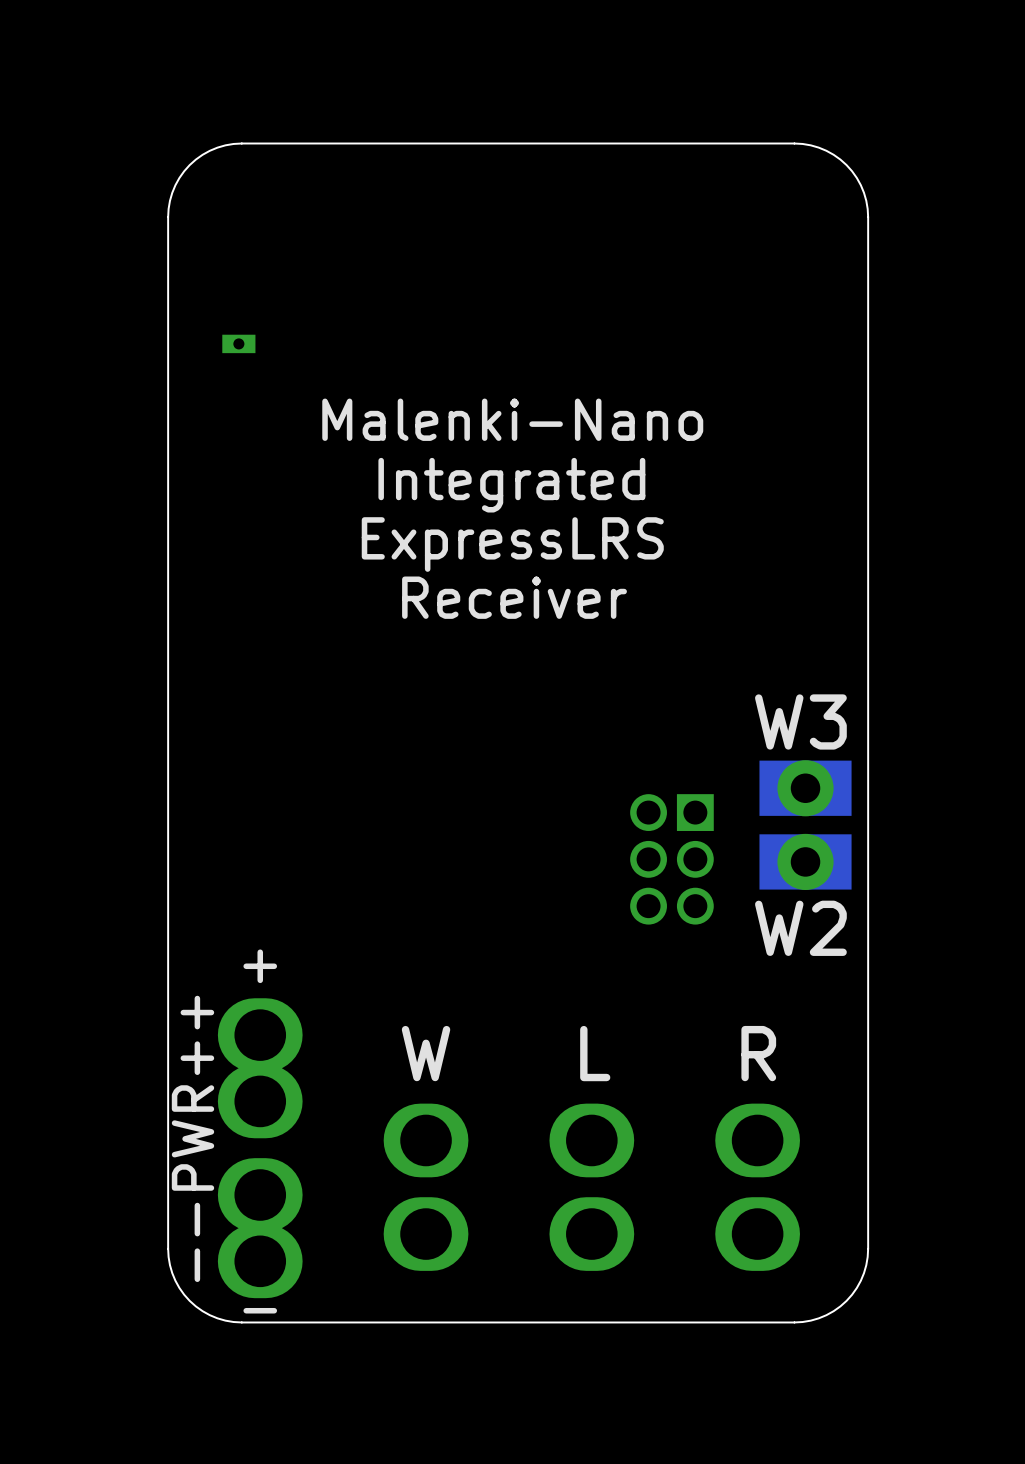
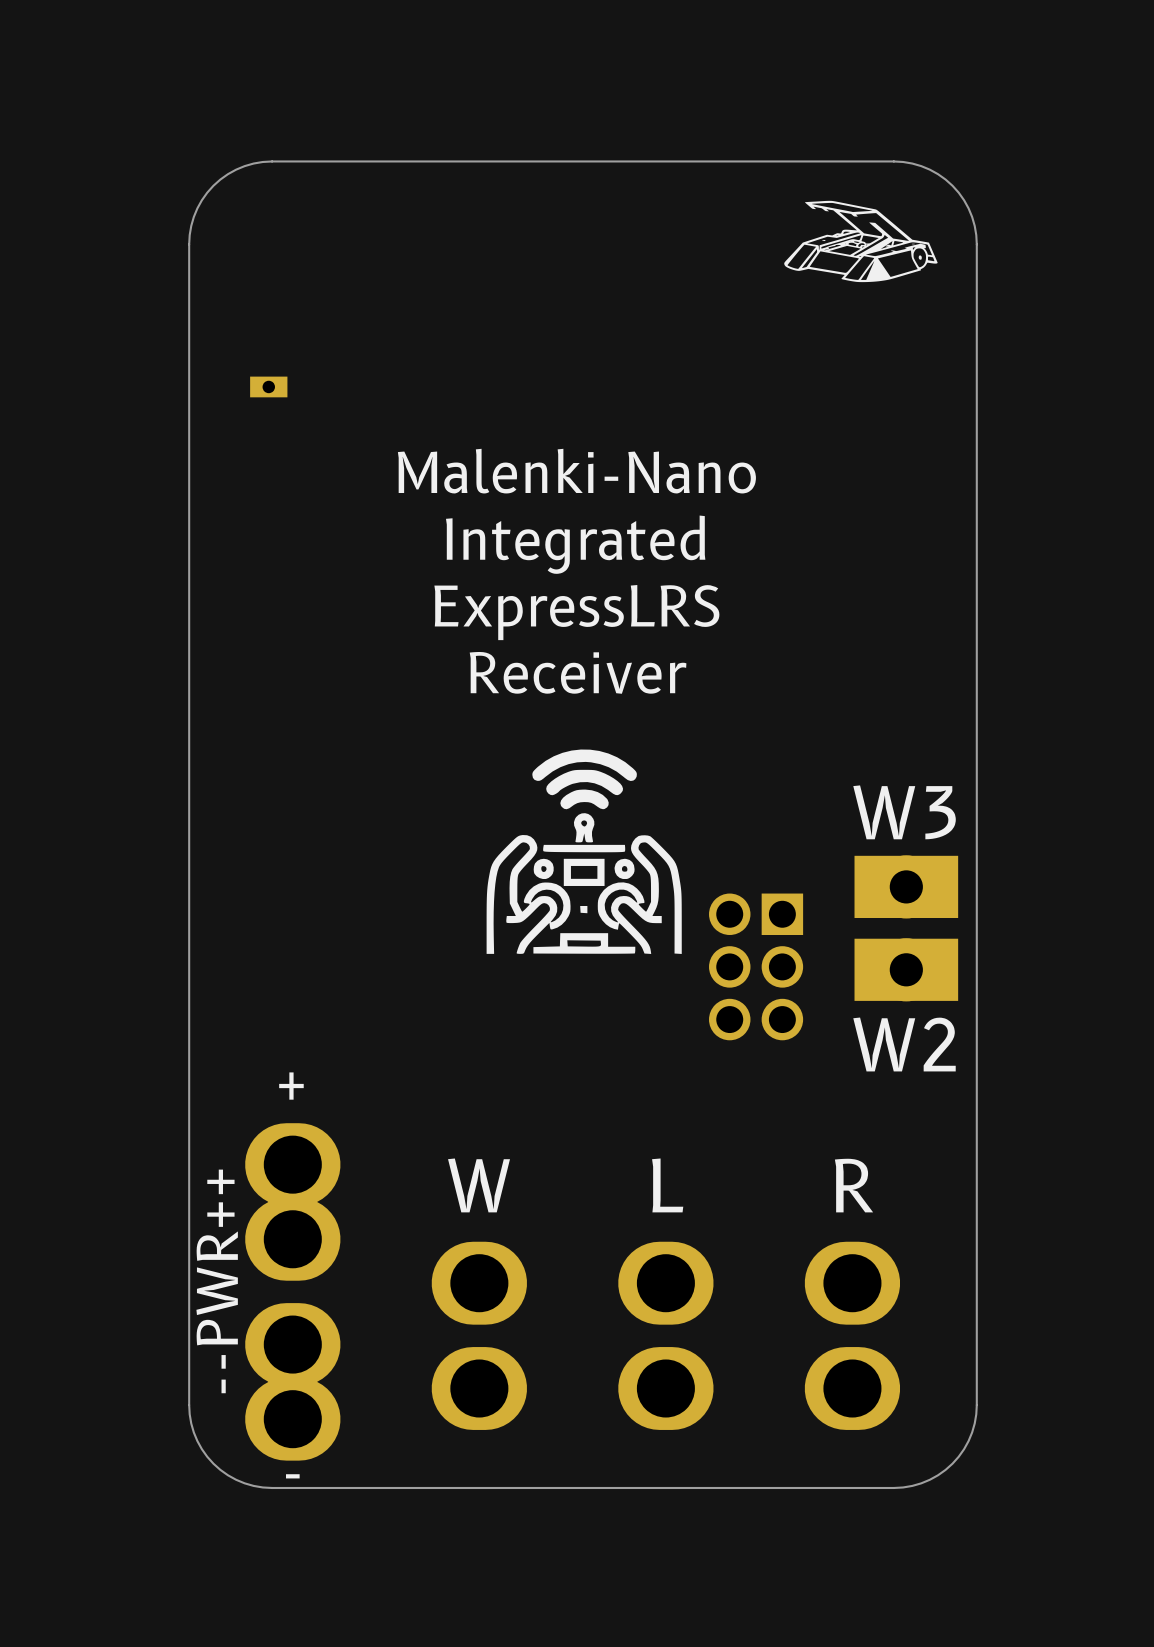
drawing: none -> [784, 200, 938, 283]
drawing: none -> [486, 749, 682, 954]

